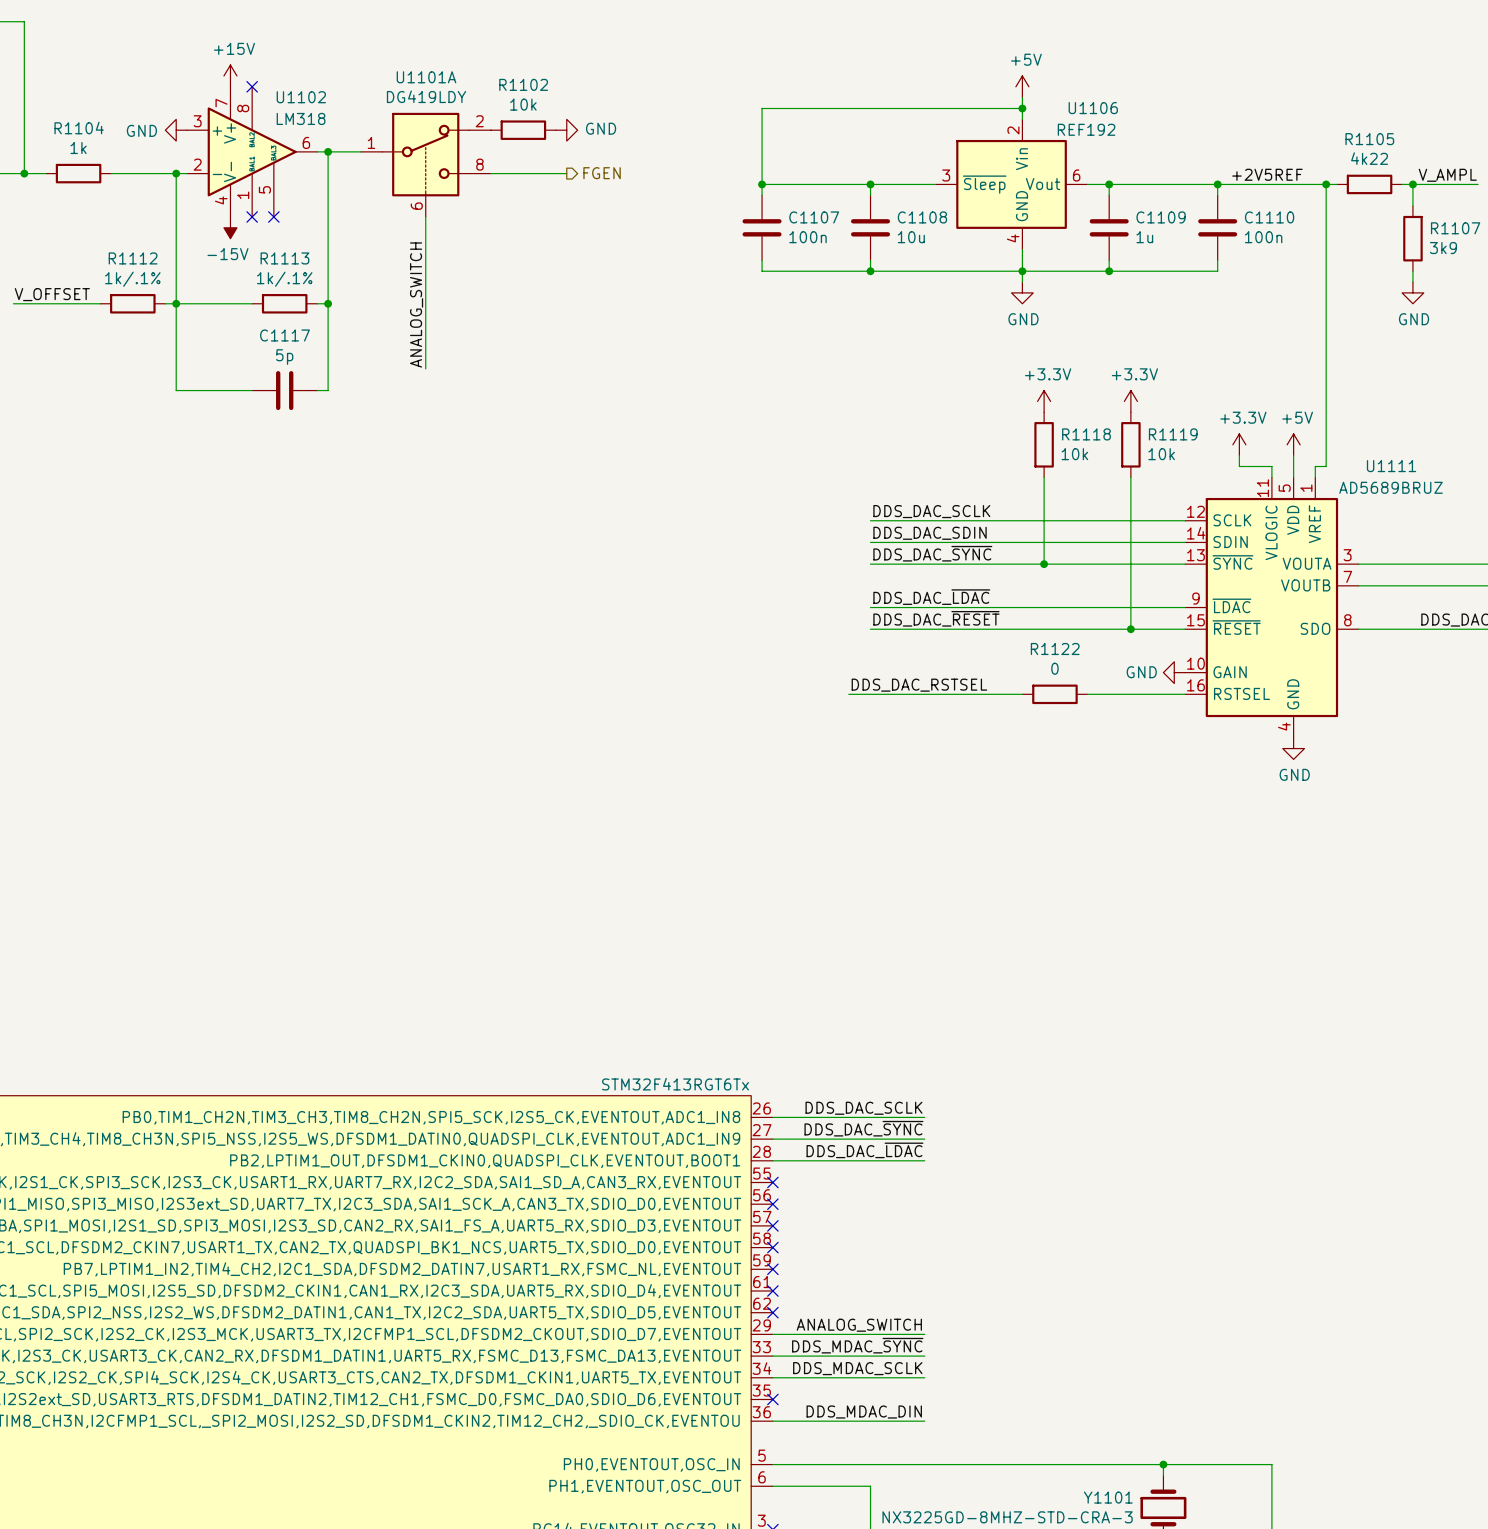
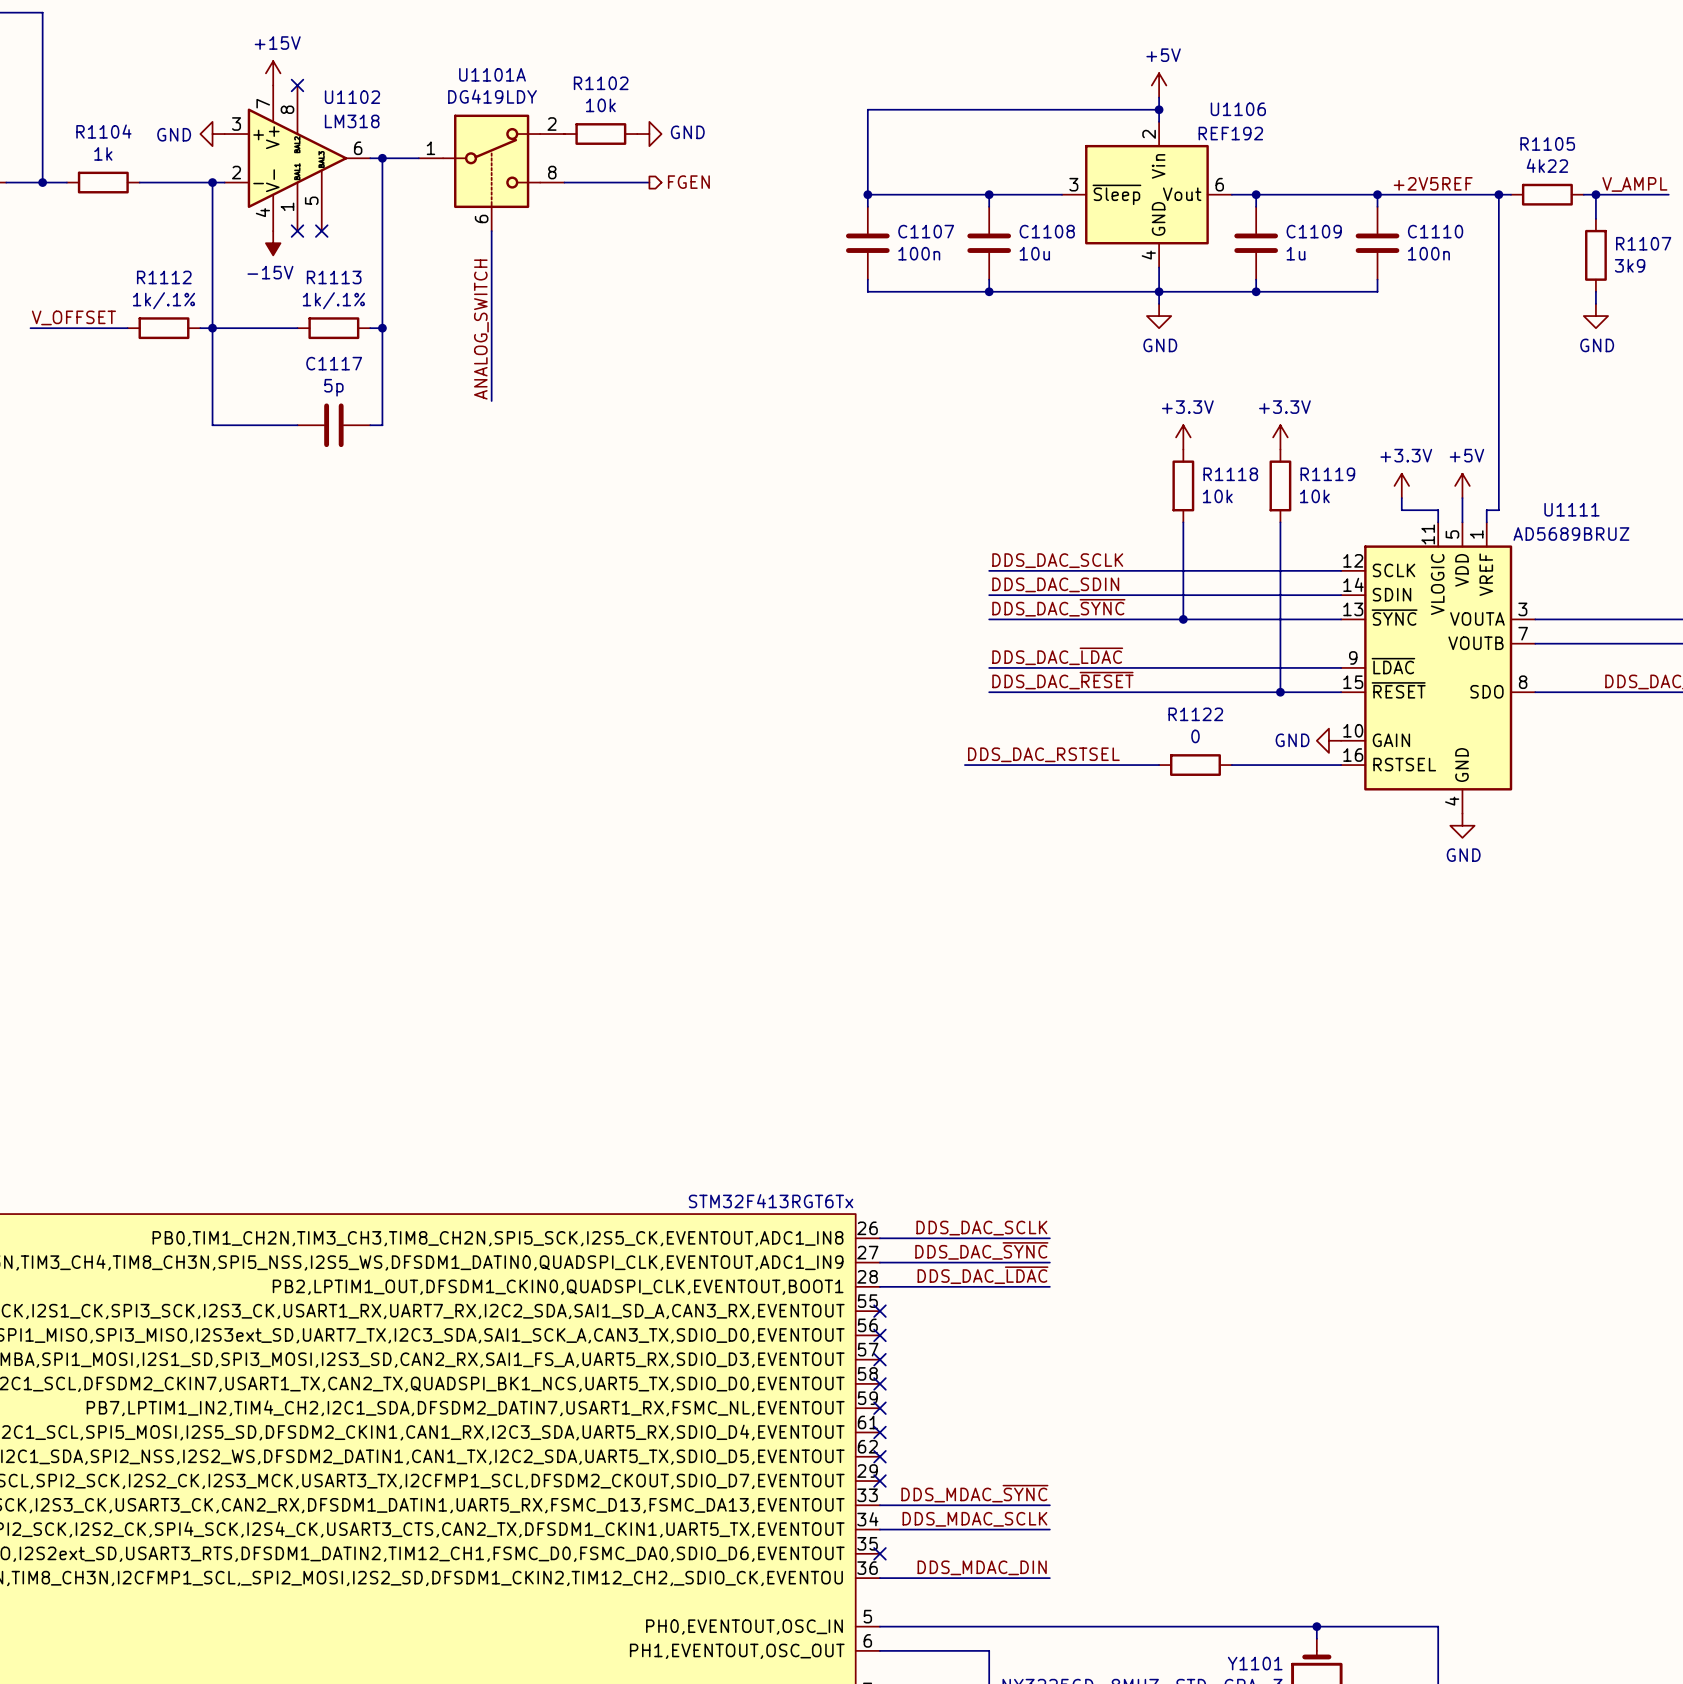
label: ANALOG_SWITCH (859, 1325) -> none
wire: (772, 1334) (924, 1334) -> none
no-connect mark: none -> (879, 1481)

